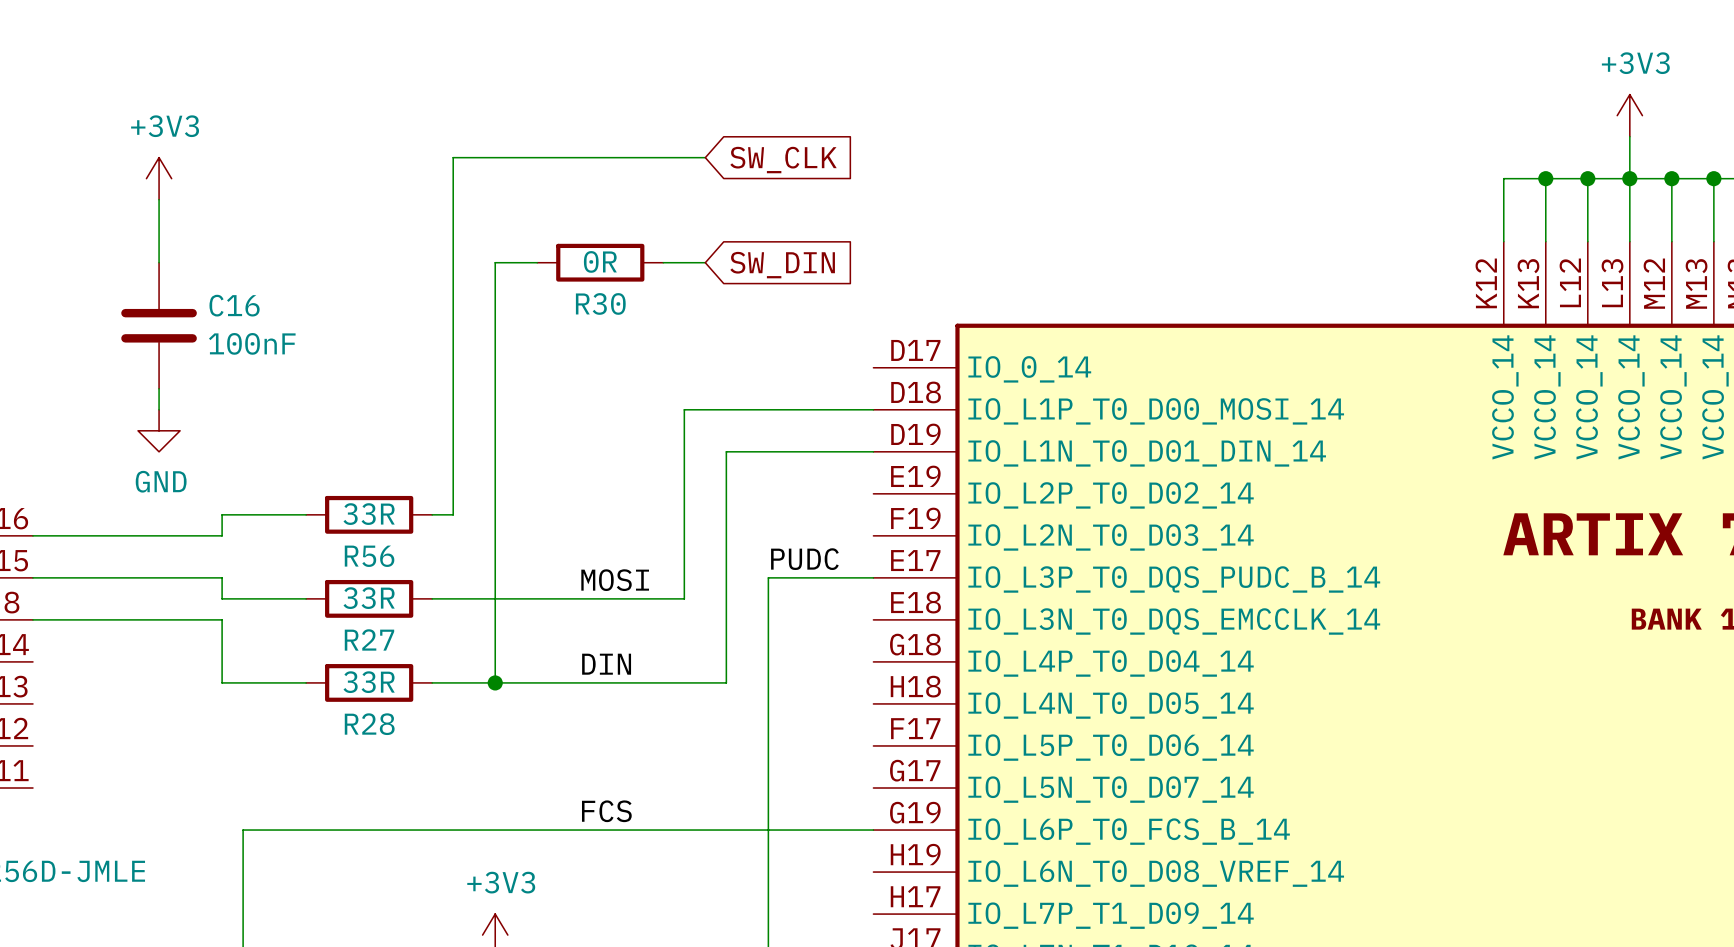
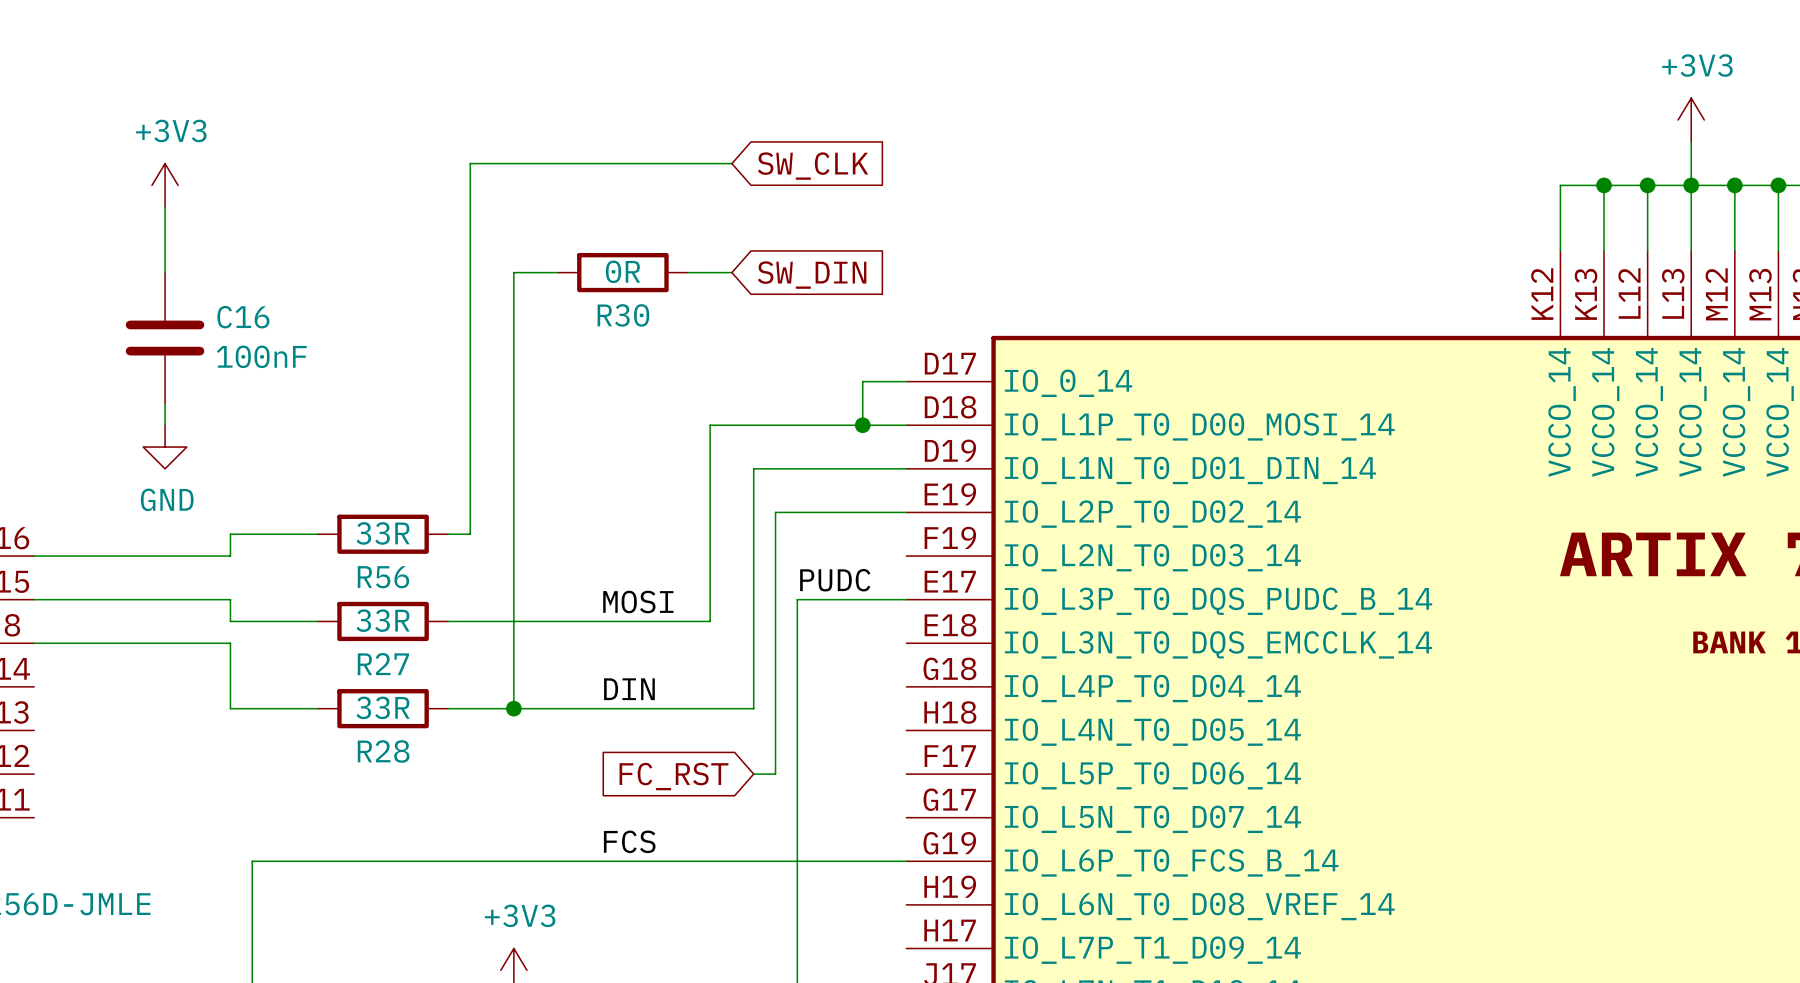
wire: none -> (906, 381) (862, 381) (862, 425)
junction: none -> (862, 425)
wire: none -> (906, 512) (775, 512) (775, 774) (753, 774)
global label: none -> FC_RST (673, 776)

